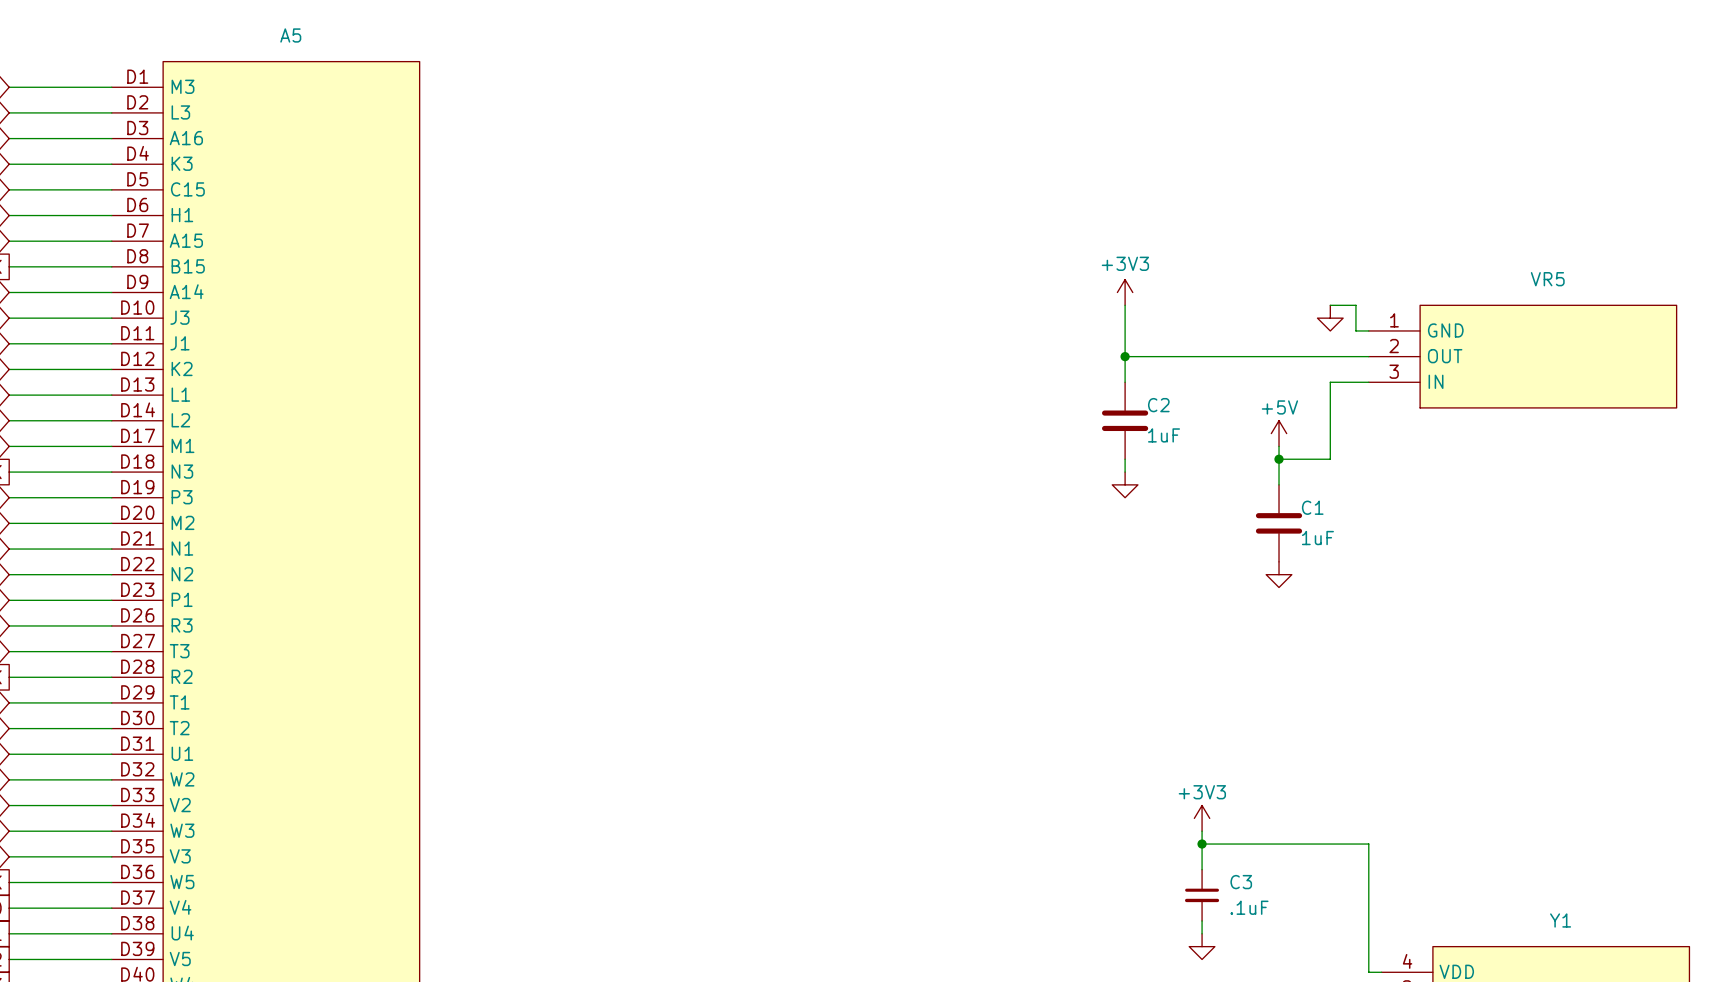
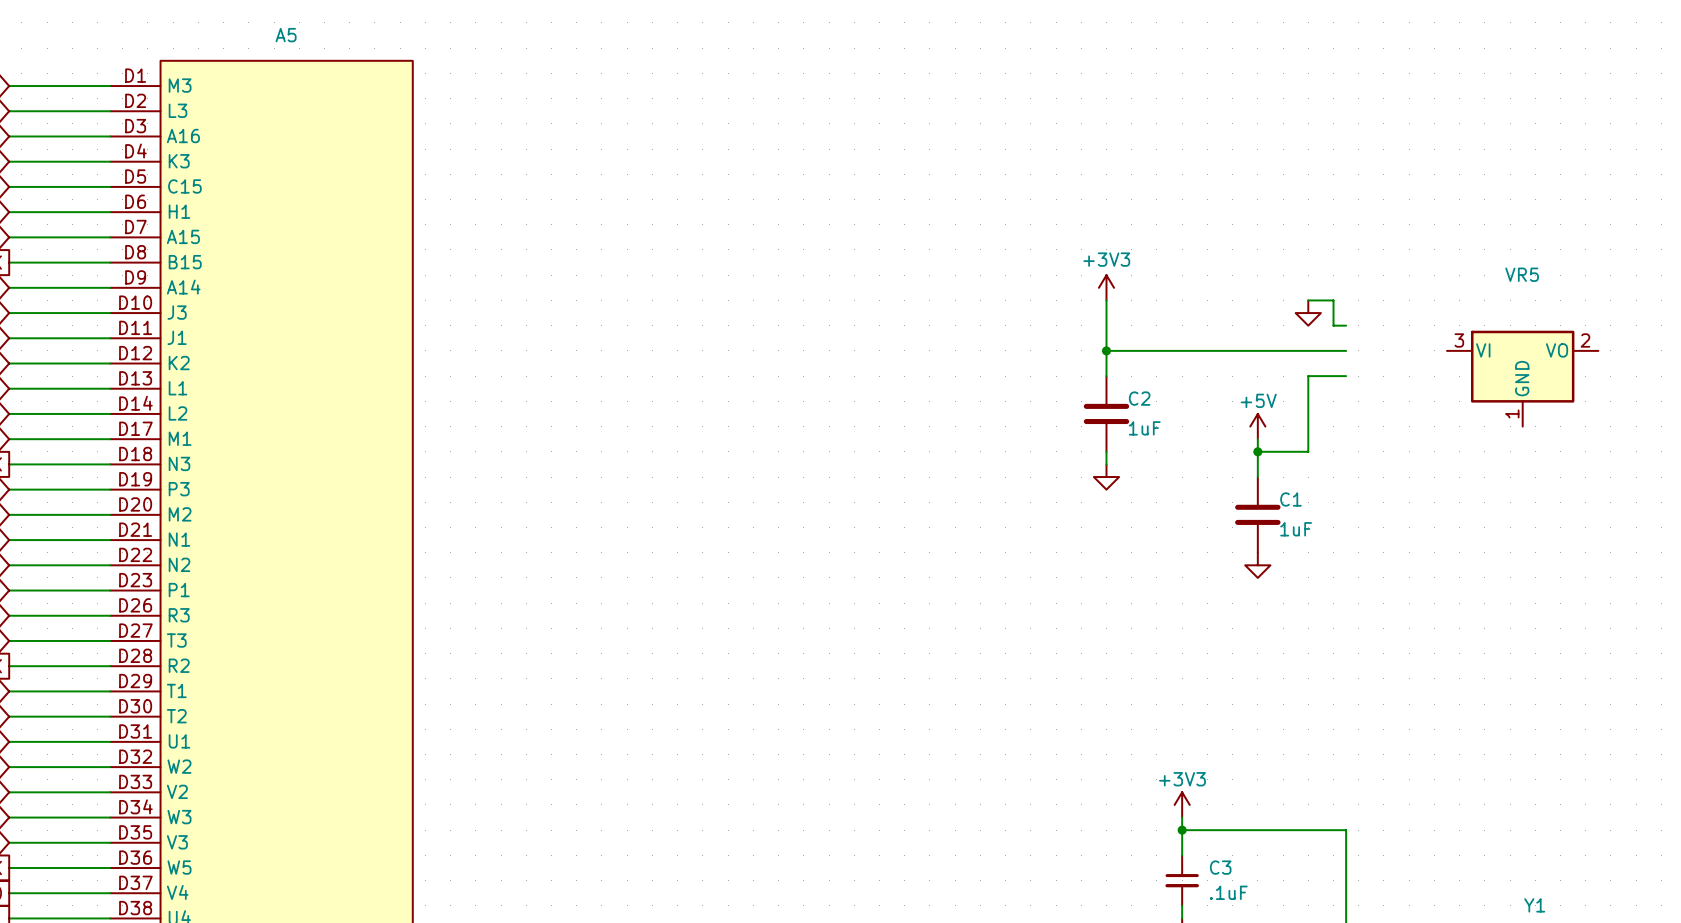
VR5 symbol: [1368, 305, 1677, 408] -> [1447, 330, 1599, 427]

